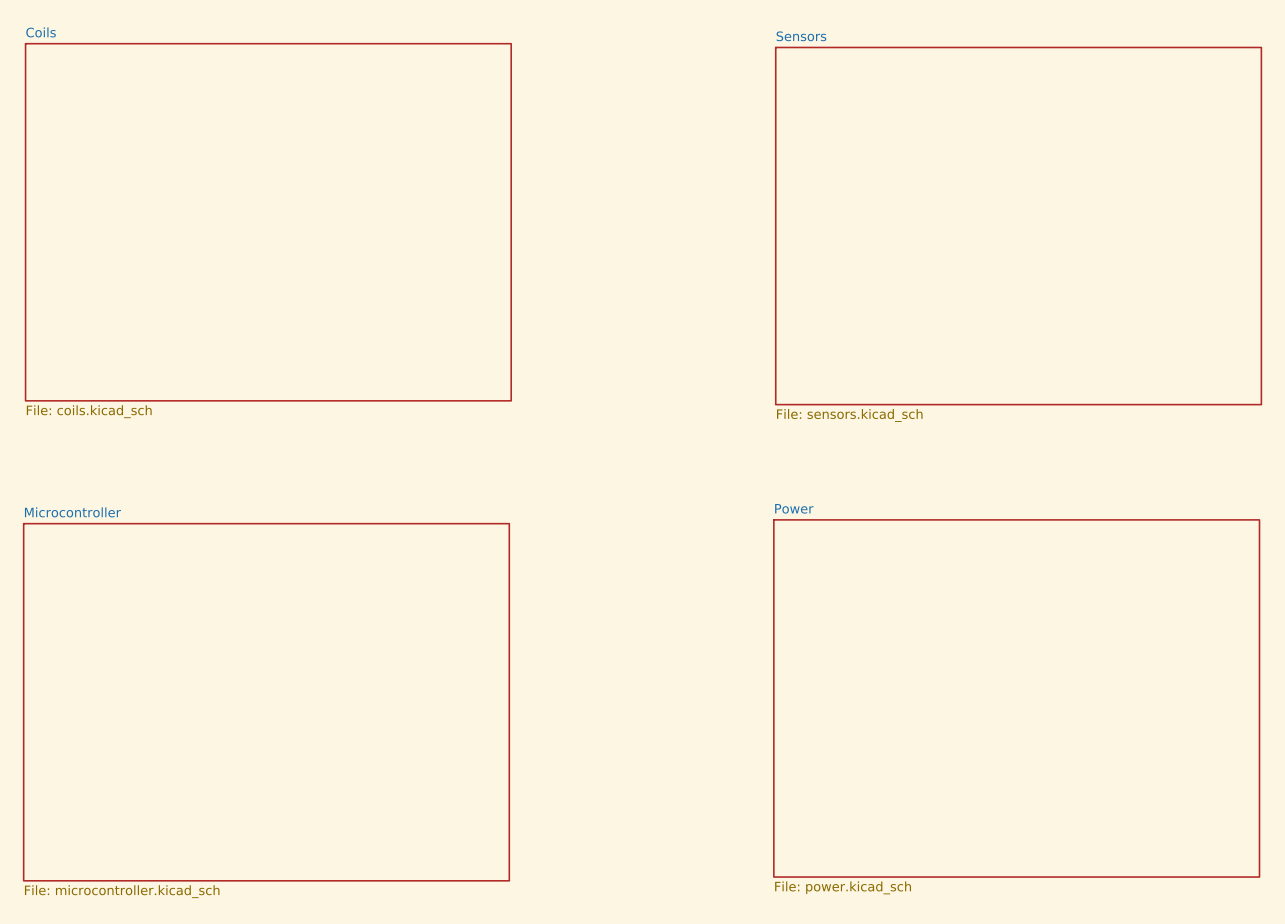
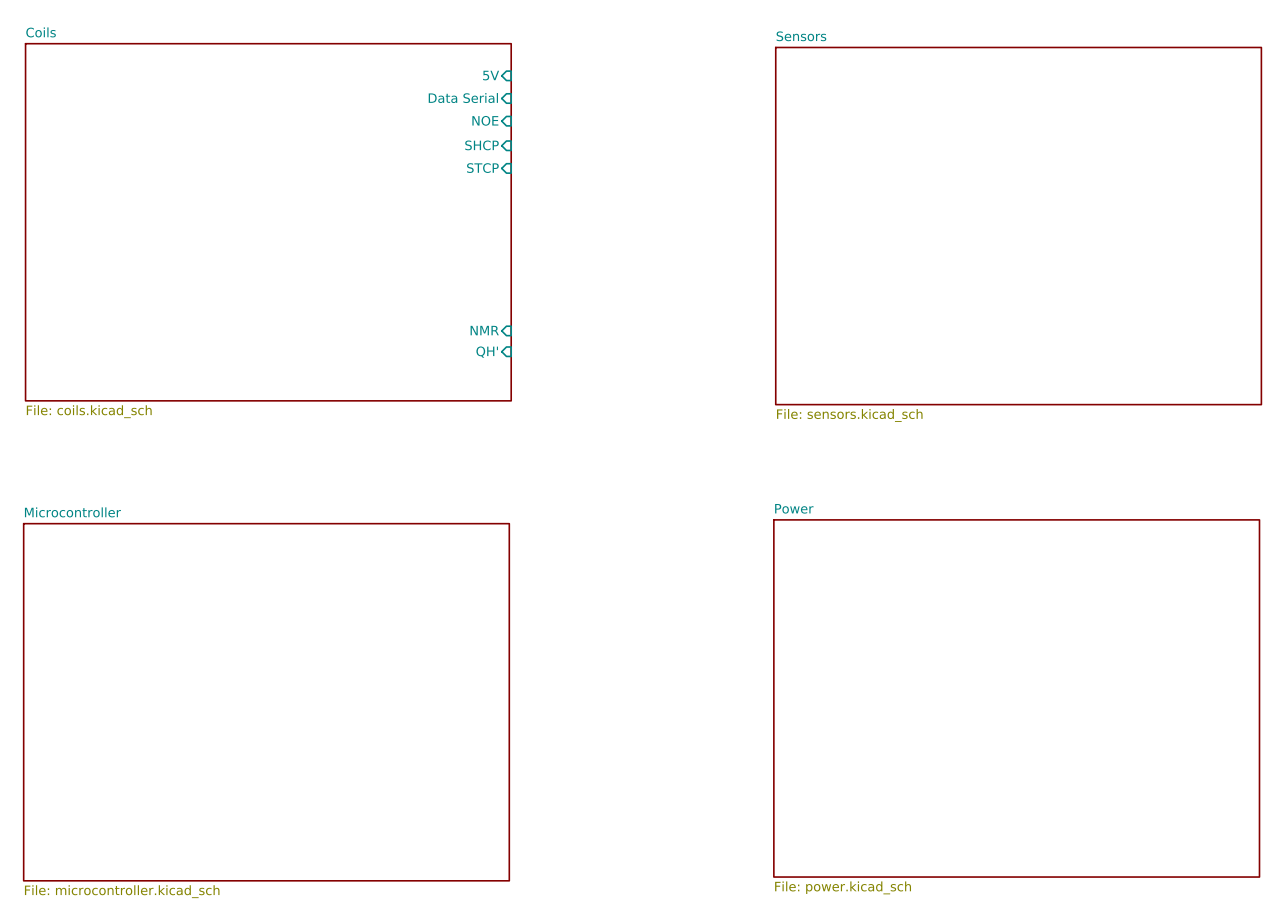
sheet pin: none -> 5V (491, 75)
sheet pin: none -> Data Serial (463, 98)
sheet pin: none -> NOE (485, 120)
sheet pin: none -> SHCP (481, 145)
sheet pin: none -> STCP (482, 168)
sheet pin: none -> NMR (484, 330)
sheet pin: none -> QH' (487, 352)

